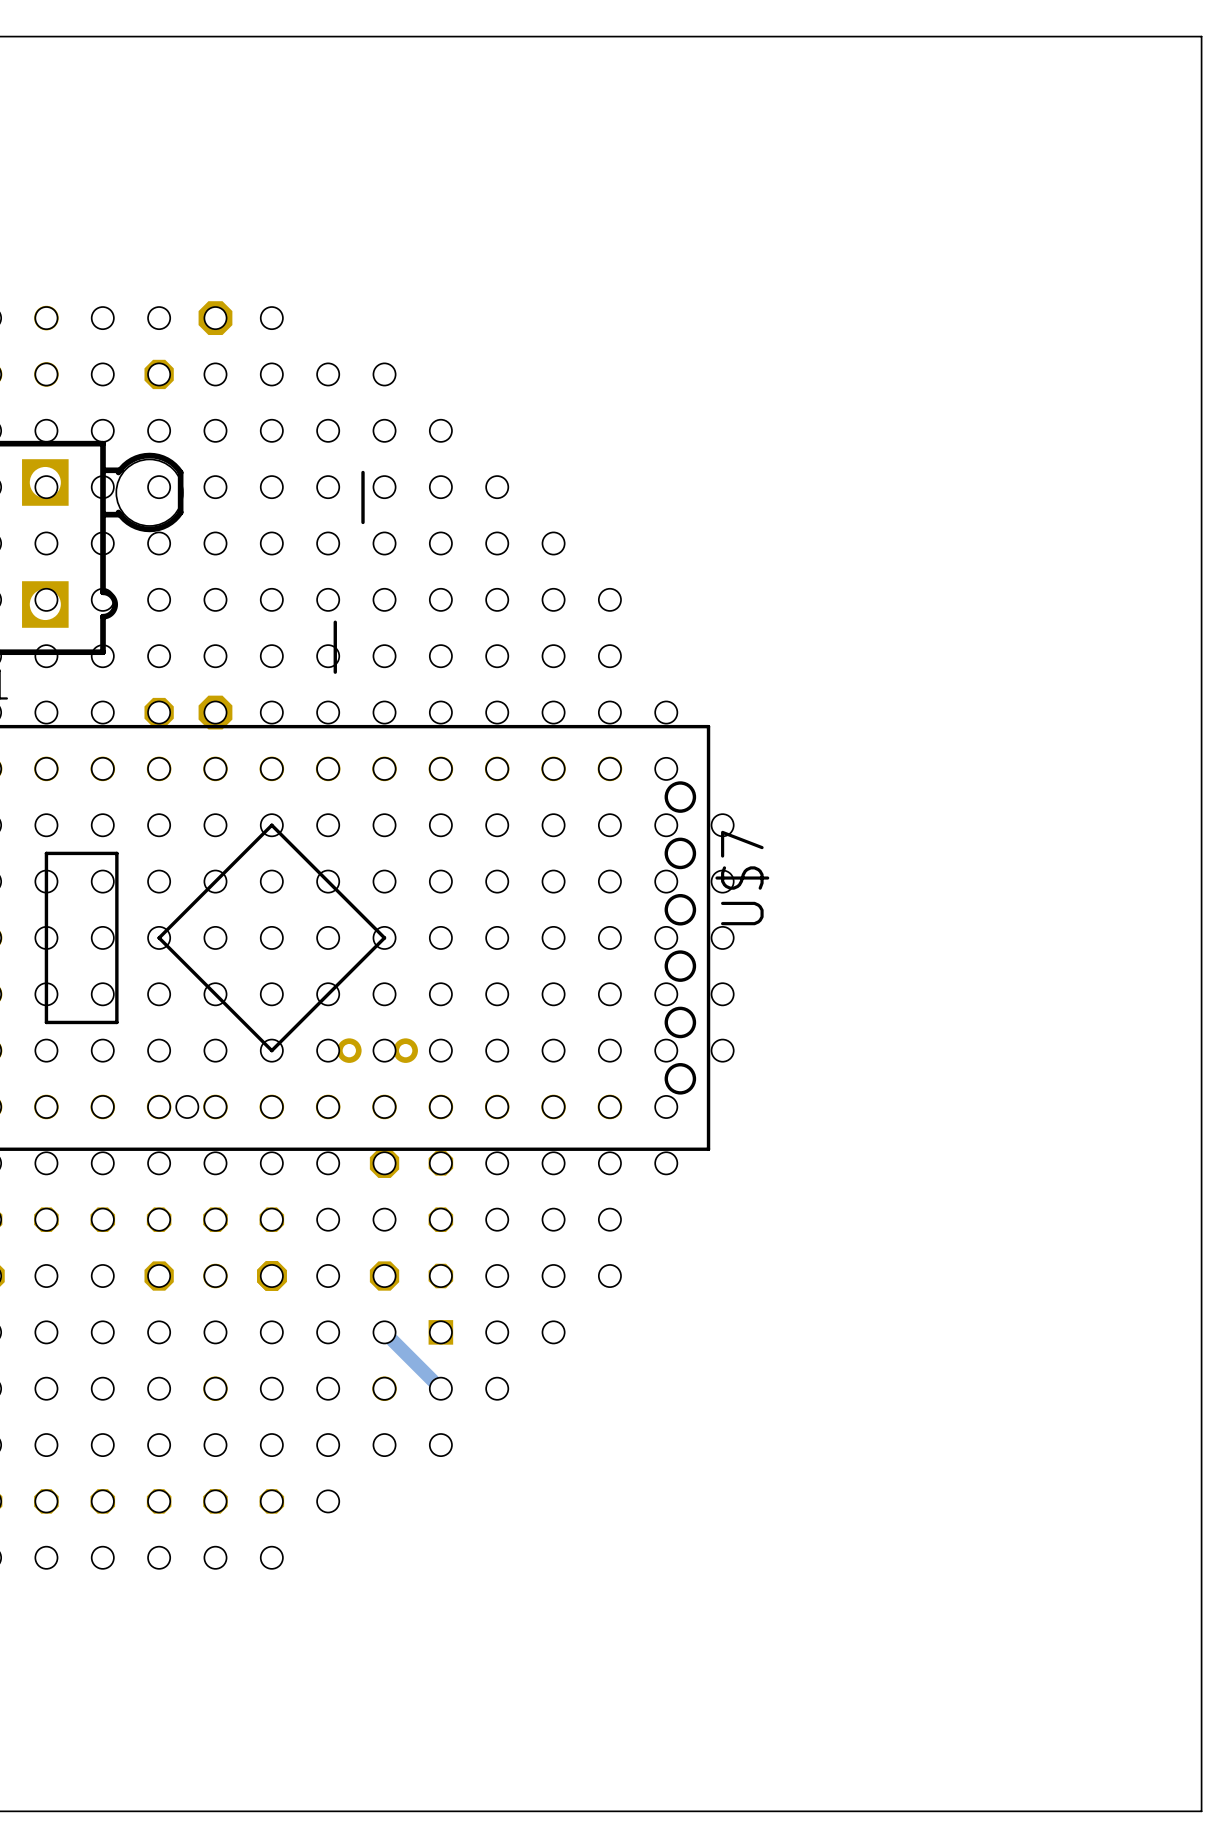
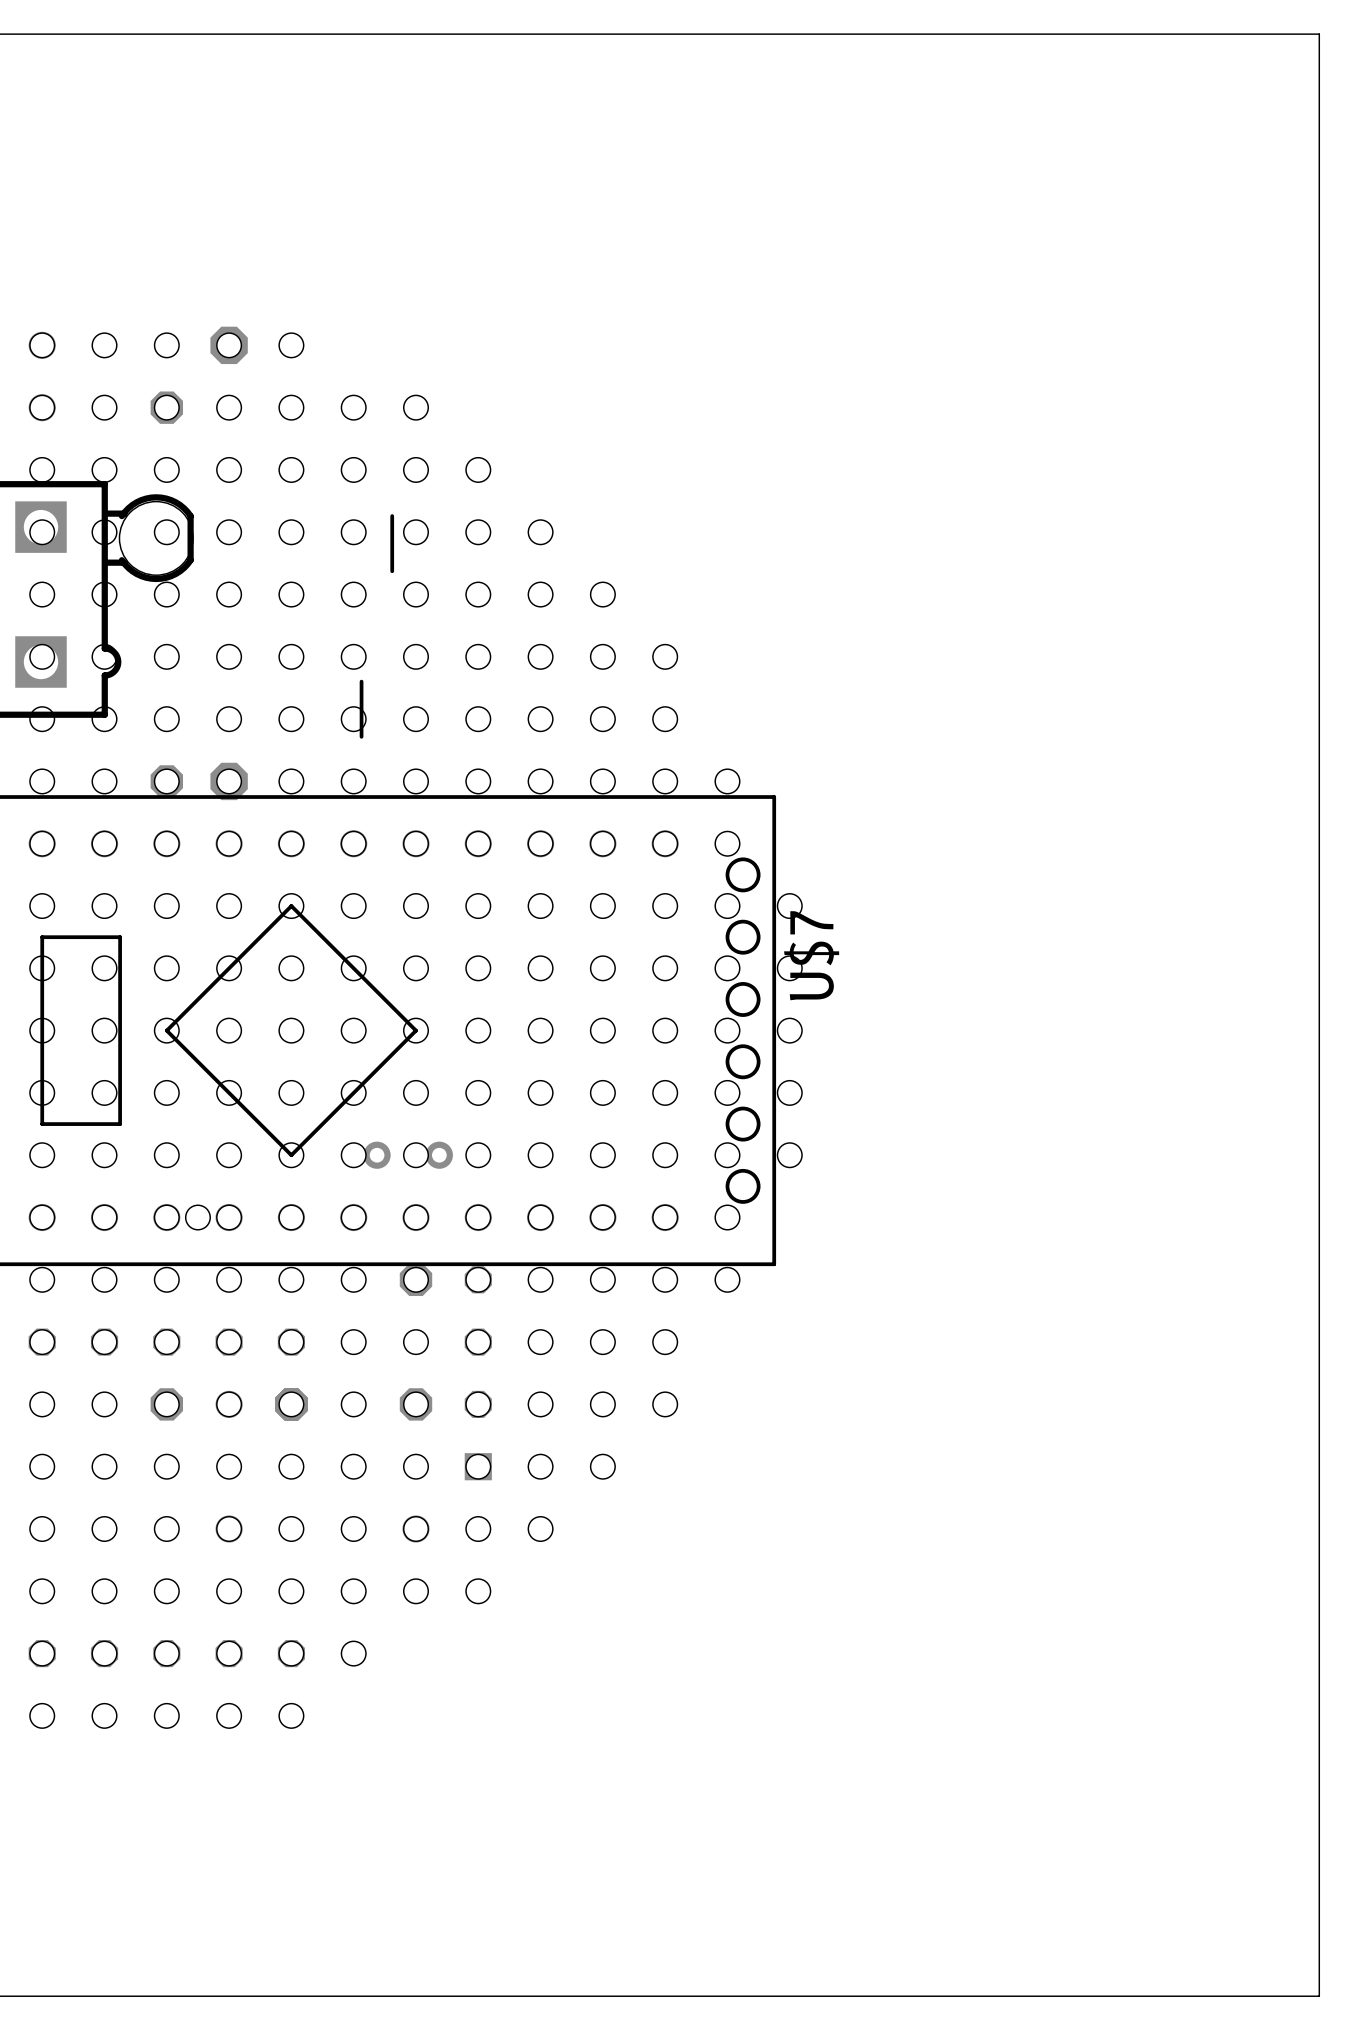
track: (384, 1332) (440, 1388) -> none

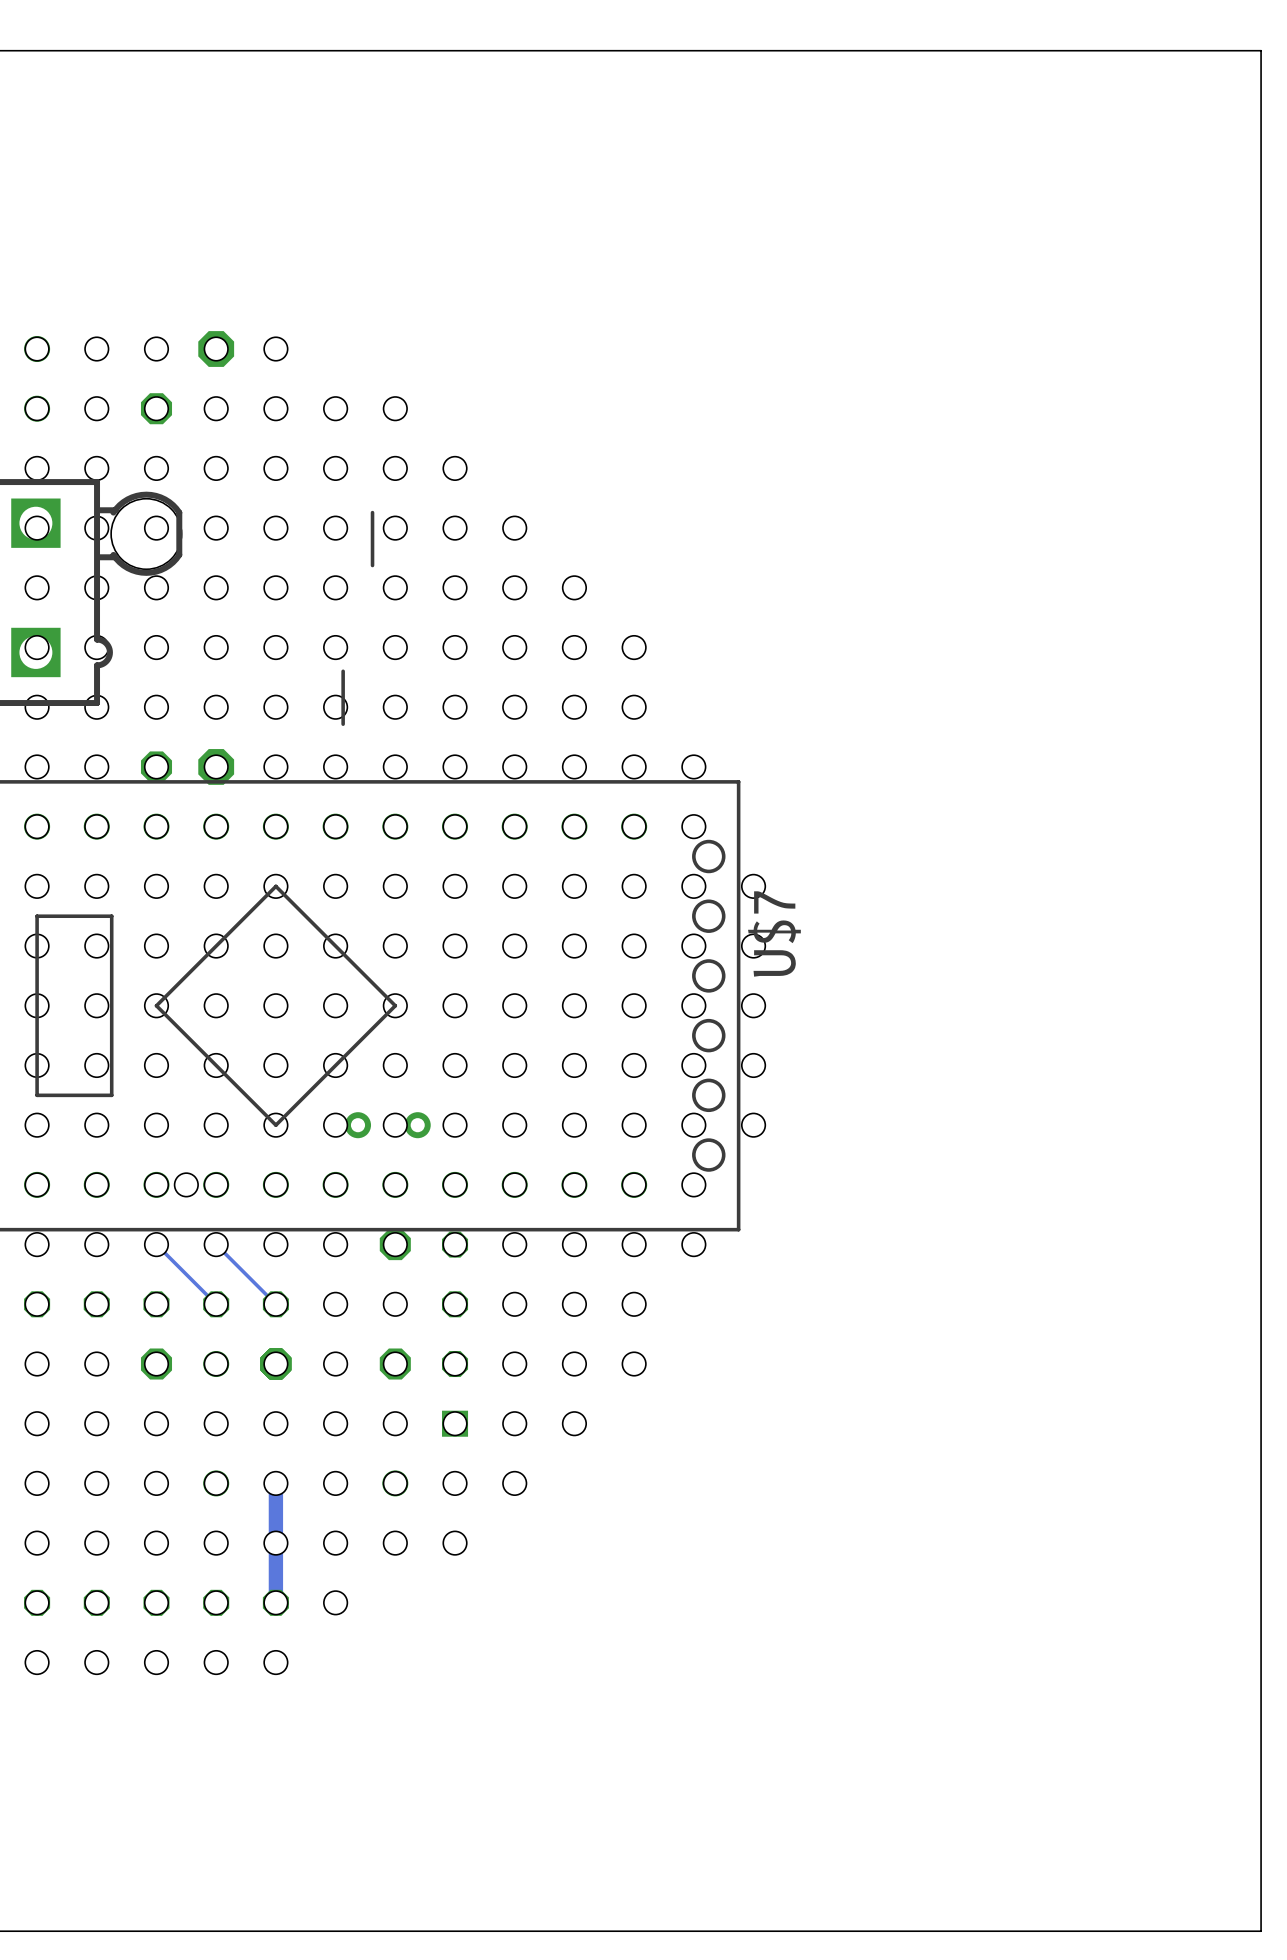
track: none -> (156, 1244) (216, 1304)
track: none -> (216, 1244) (275, 1304)
track: none -> (275, 1483) (275, 1602)

